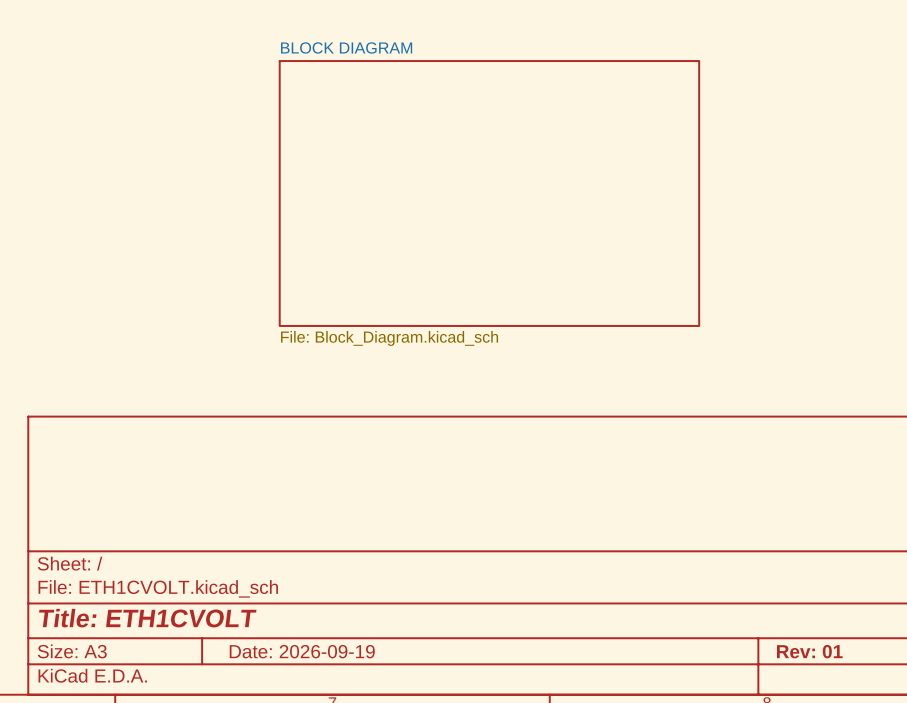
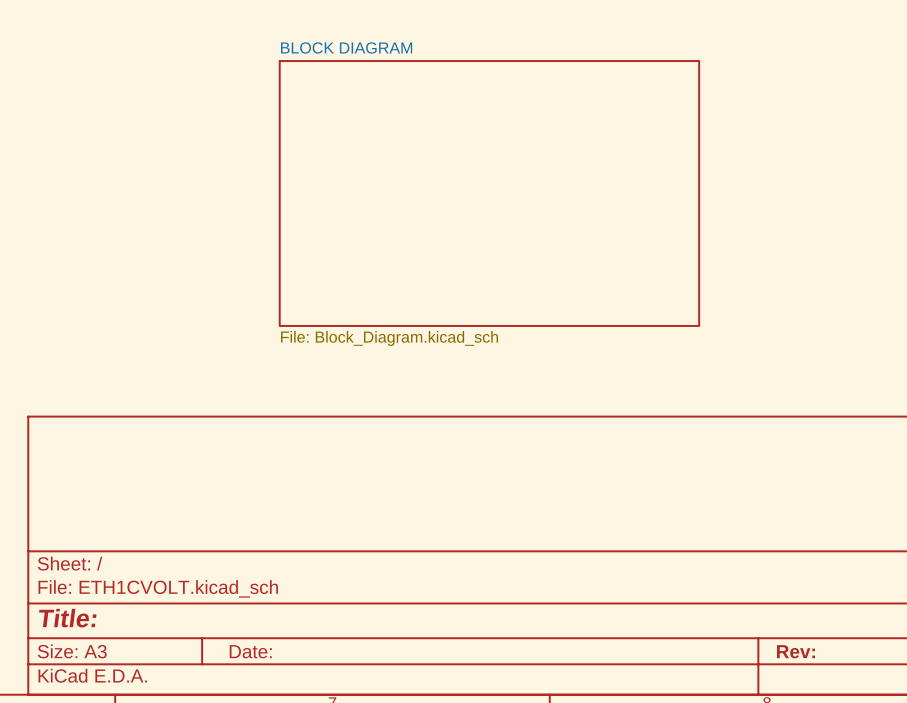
title block: Title: ETH1CVOLT (147, 618) -> Title: (67, 618)
title block: Date: 2026-09-19 (302, 651) -> Date: (250, 651)
title block: Rev: 01 (809, 651) -> Rev: (796, 651)

